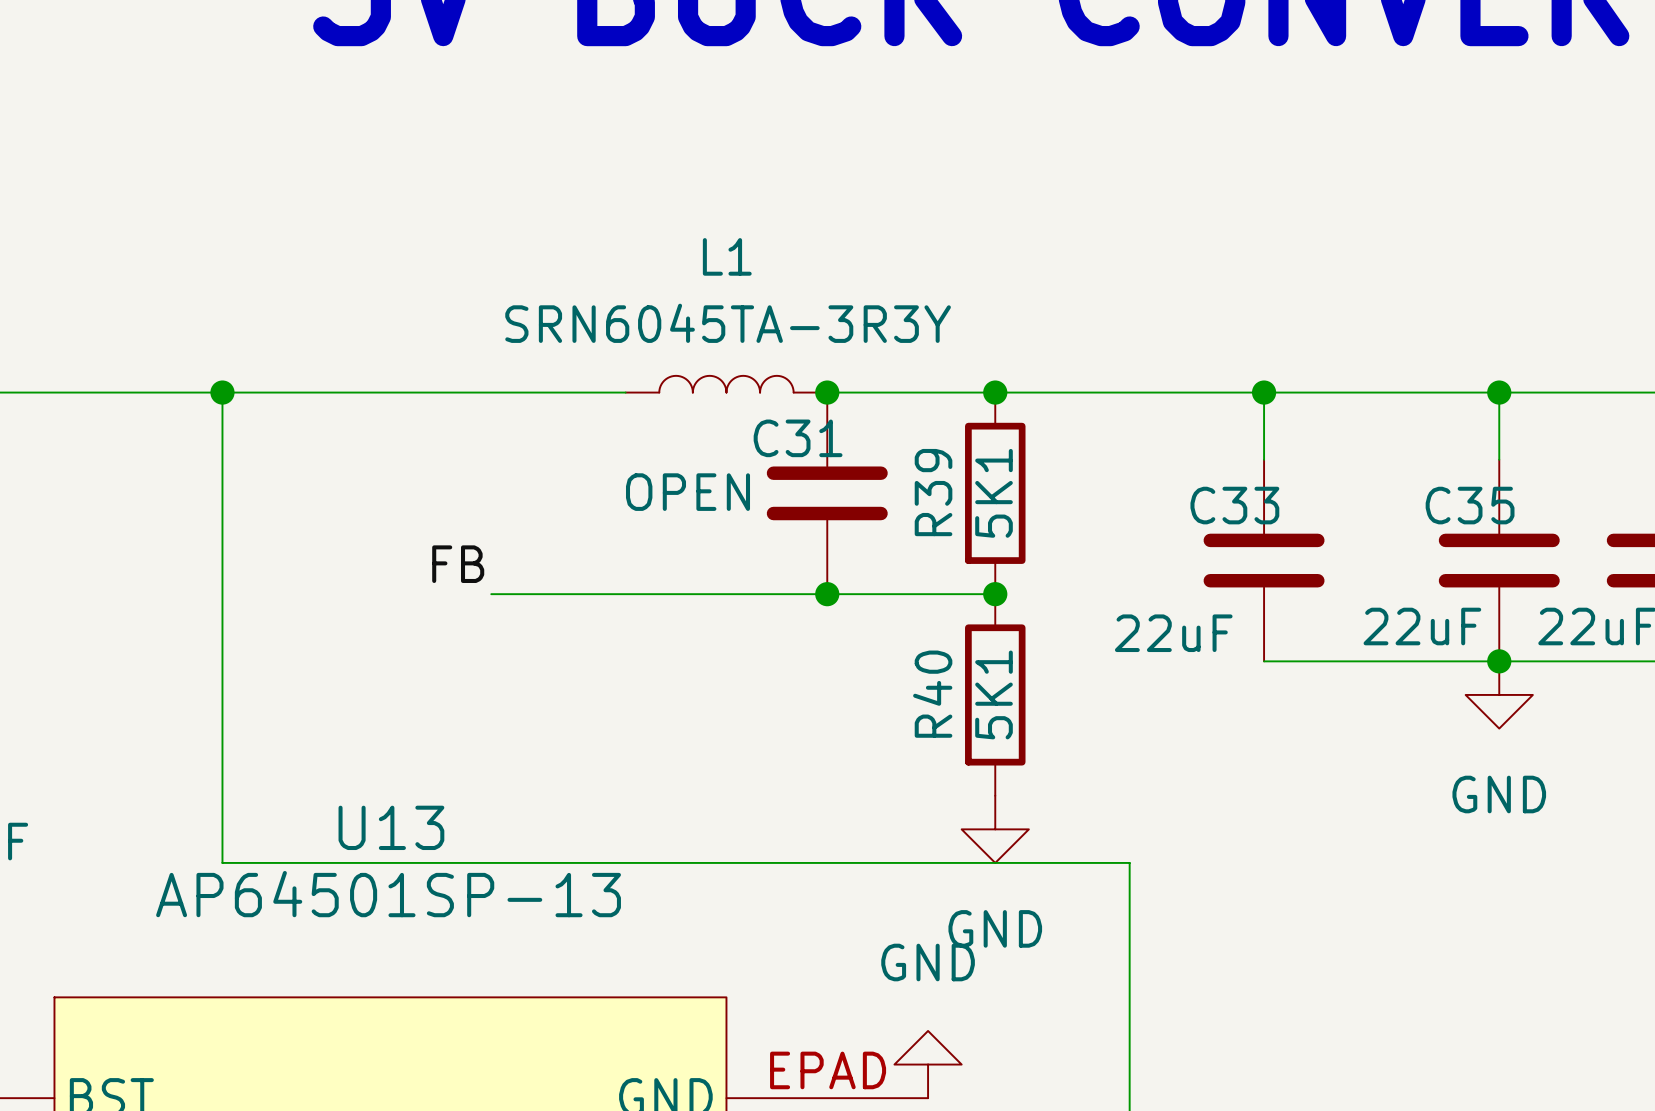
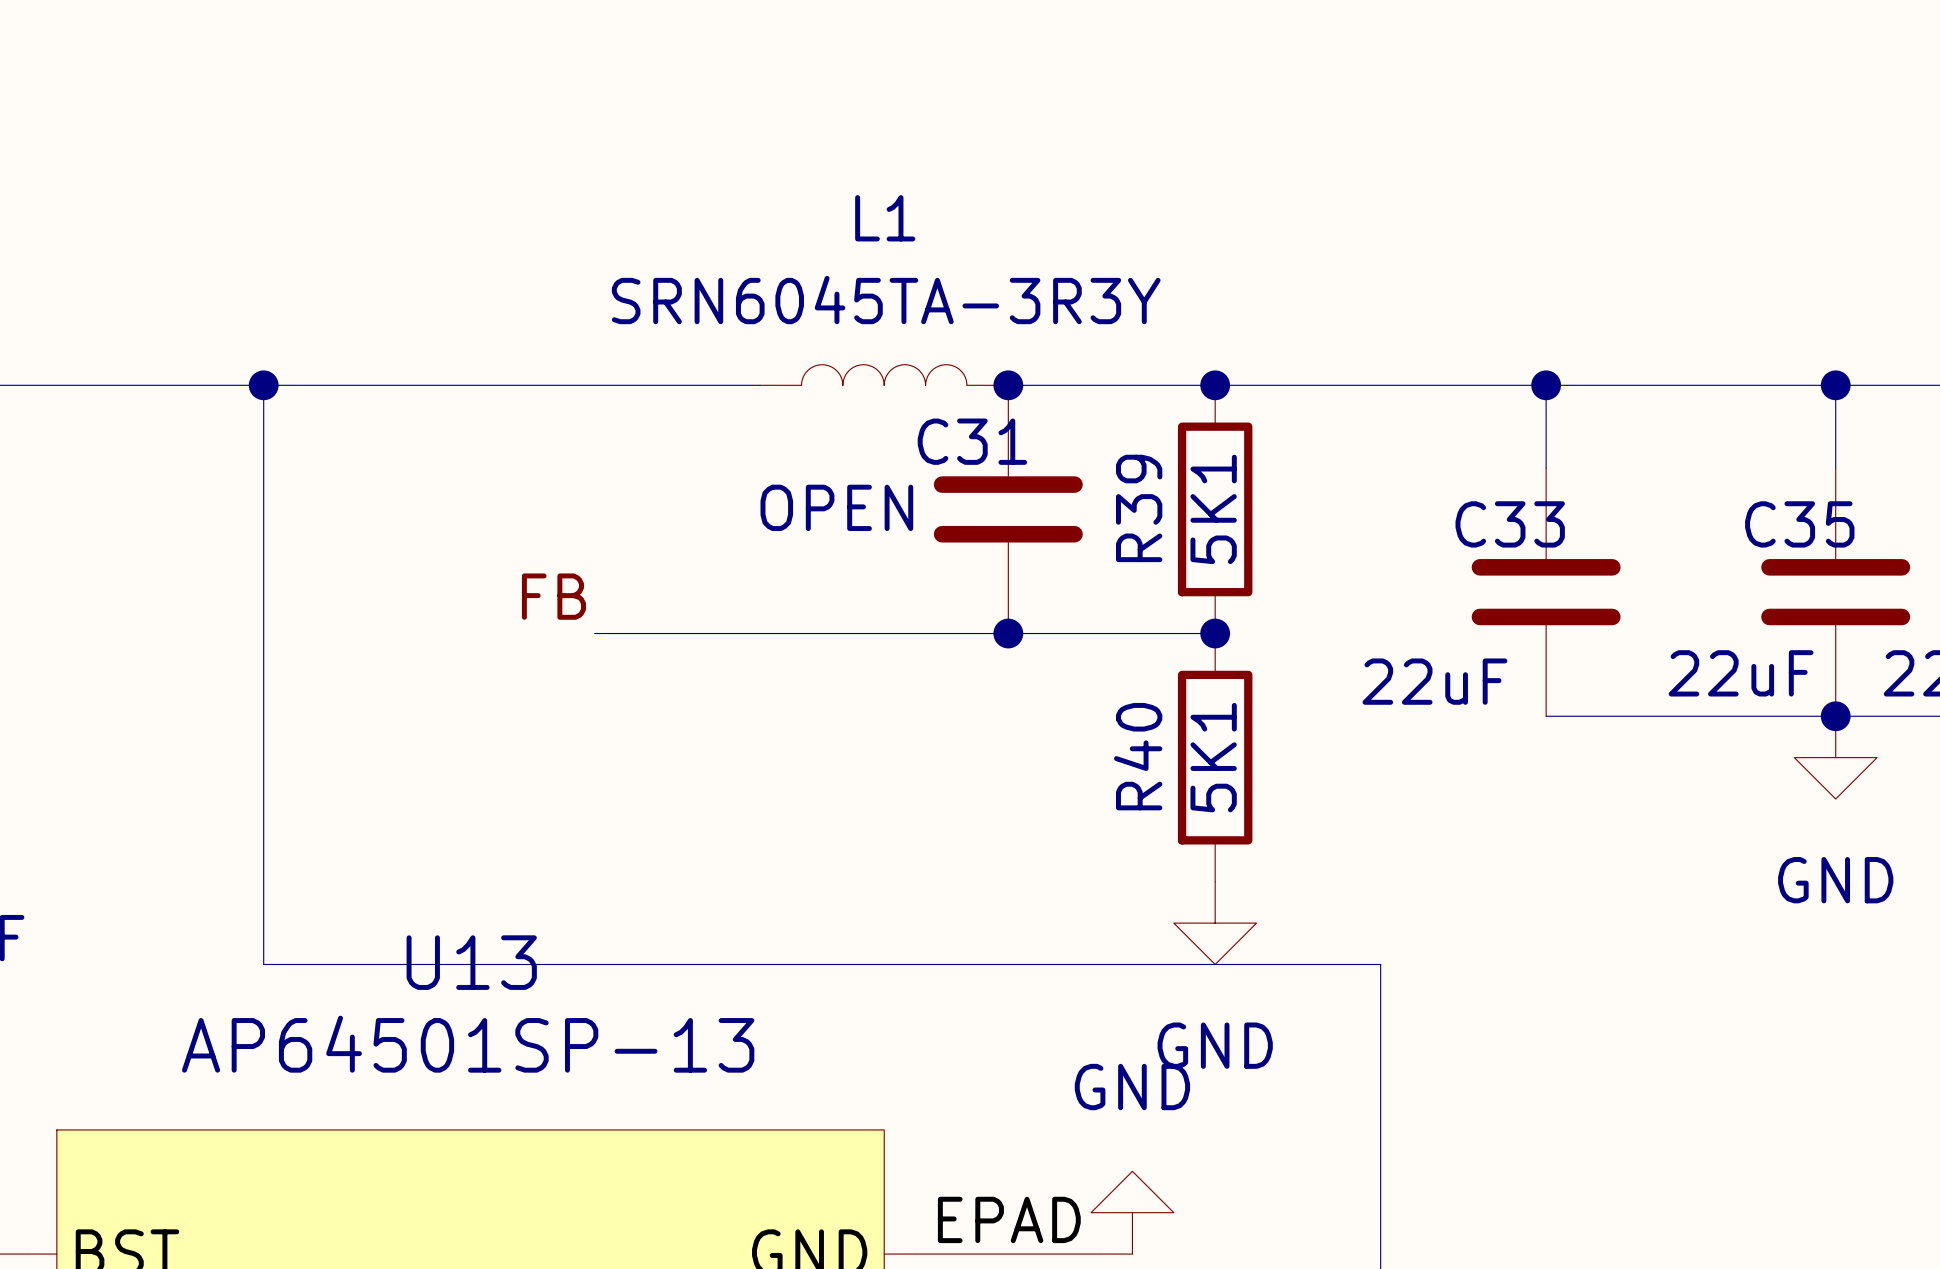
U13 name position: U13 (391, 827) -> U13 (471, 962)
U13 value position: AP64501SP-13 (388, 894) -> AP64501SP-13 (468, 1044)

